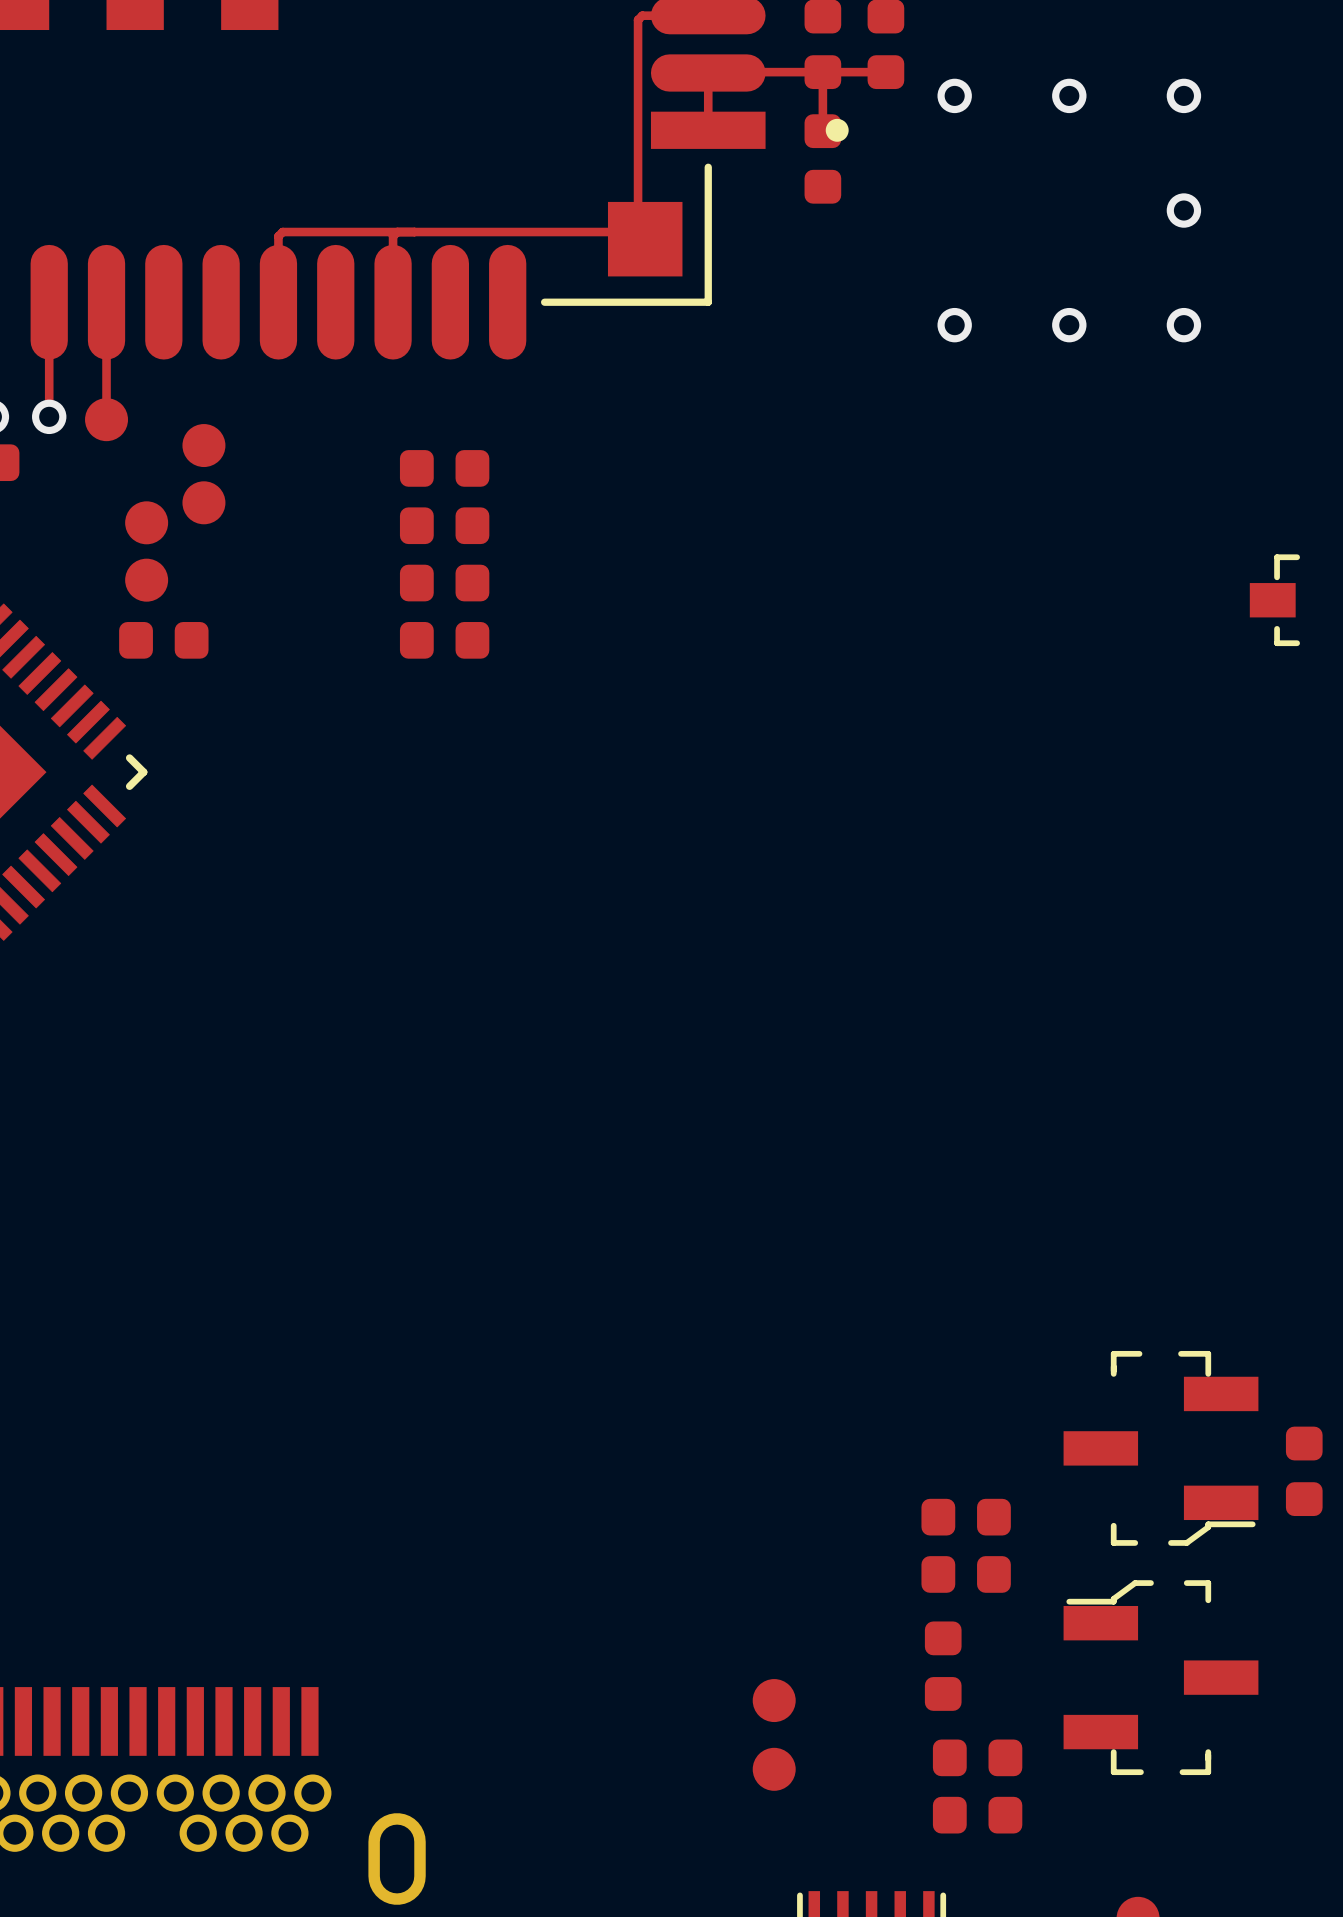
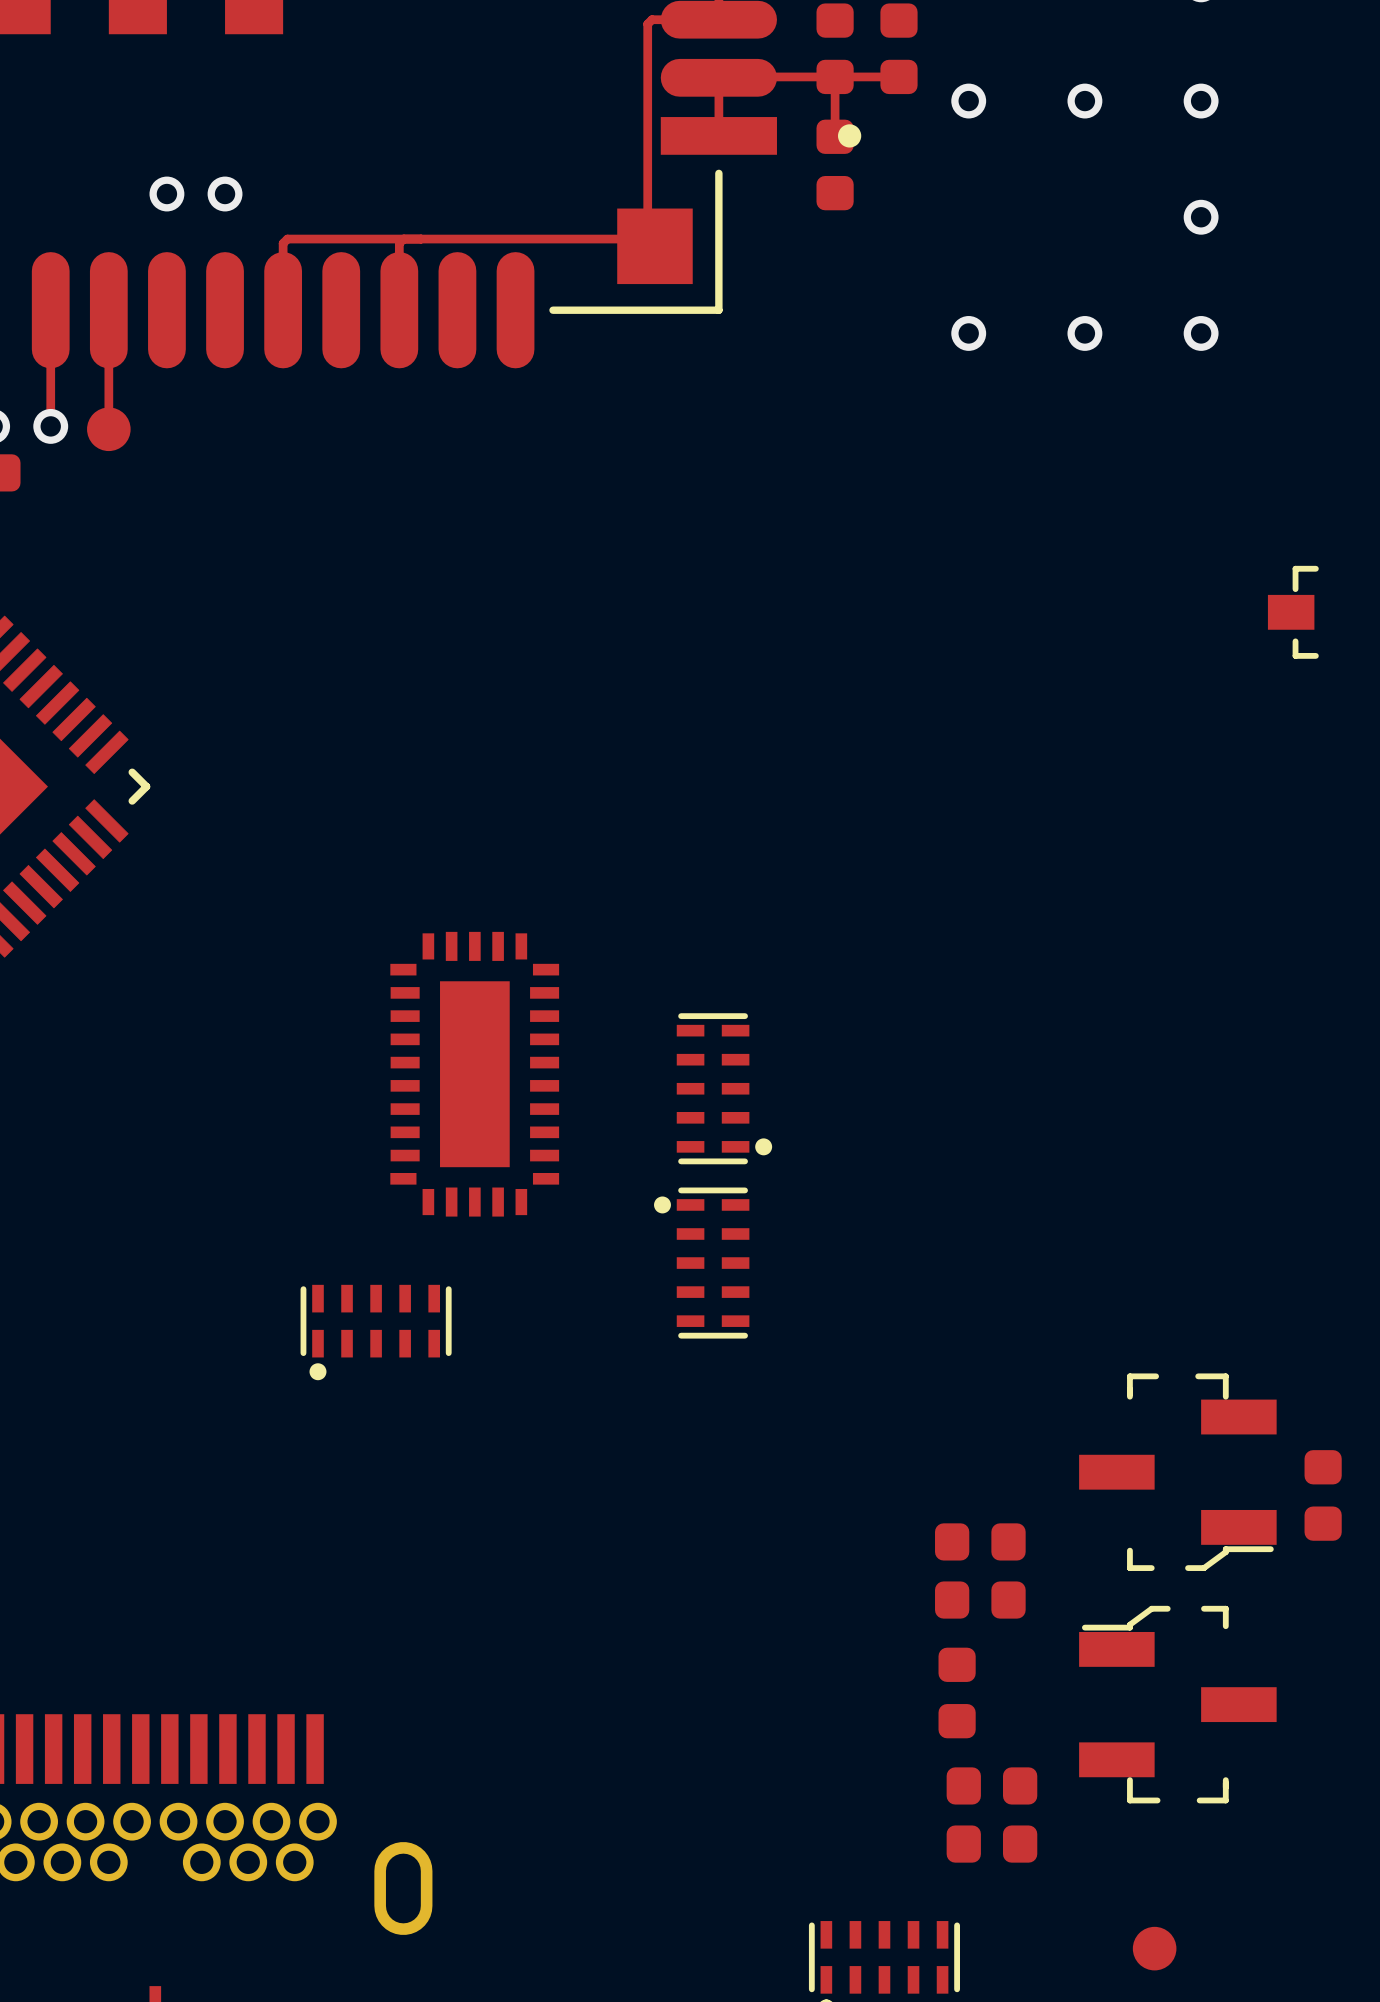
via: none -> (166, 194)
via: none -> (225, 194)
part: (203, 445) -> none
part: (444, 468) -> none
part: (203, 502) -> none
part: (146, 522) -> none
part: (444, 525) -> none
part: (146, 580) -> none
part: (444, 583) -> none
part: (163, 640) -> none
part: (444, 640) -> none
part: none -> (474, 1074)
part: none -> (724, 1088)
part: none -> (701, 1263)
part: none -> (376, 1332)
part: (774, 1700) -> none
part: (774, 1769) -> none

